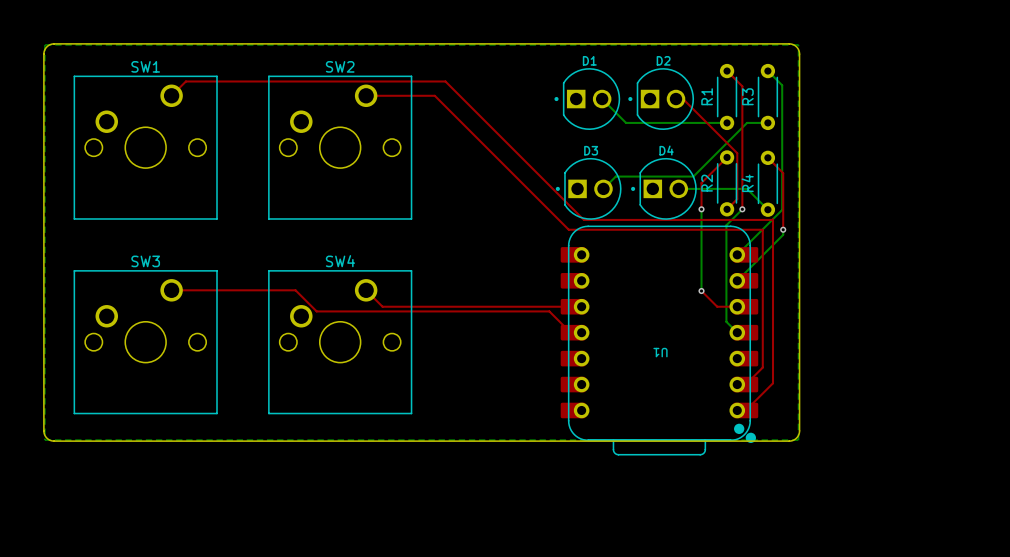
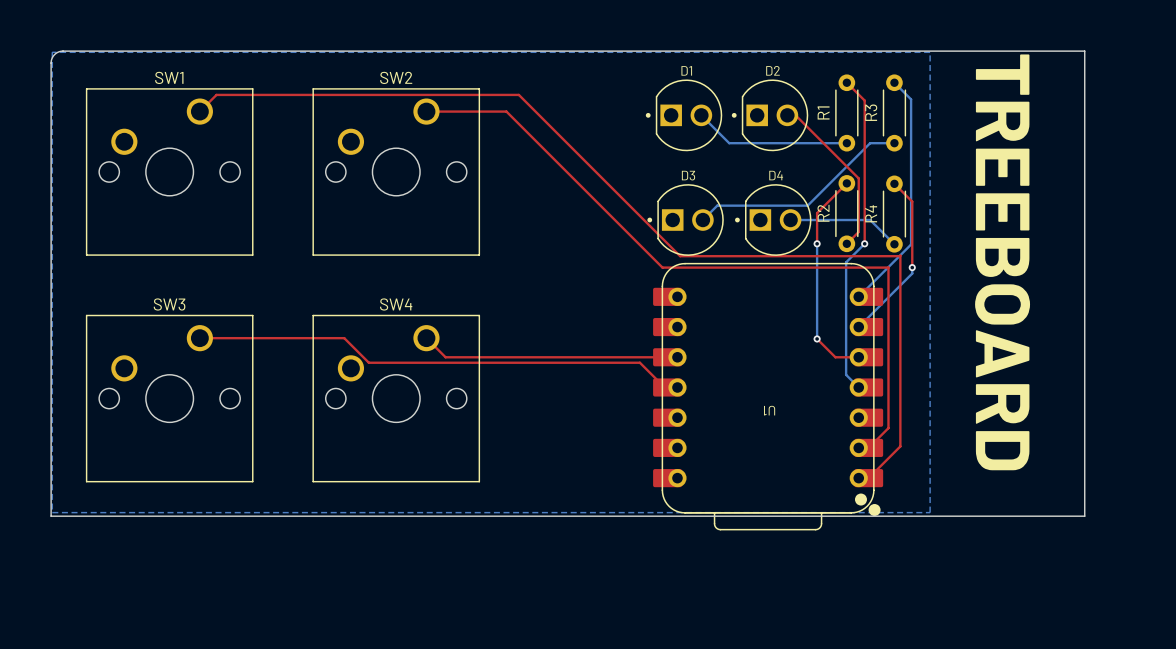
board edge: (789, 43) (796, 46) (799, 54) (799, 430) (797, 436) (793, 440) (54, 441) (46, 438) (43, 430) -> (919, 51) (1084, 51) (1084, 516) (51, 516) (51, 501)
text: none -> TREEBOARD (1002, 262)

